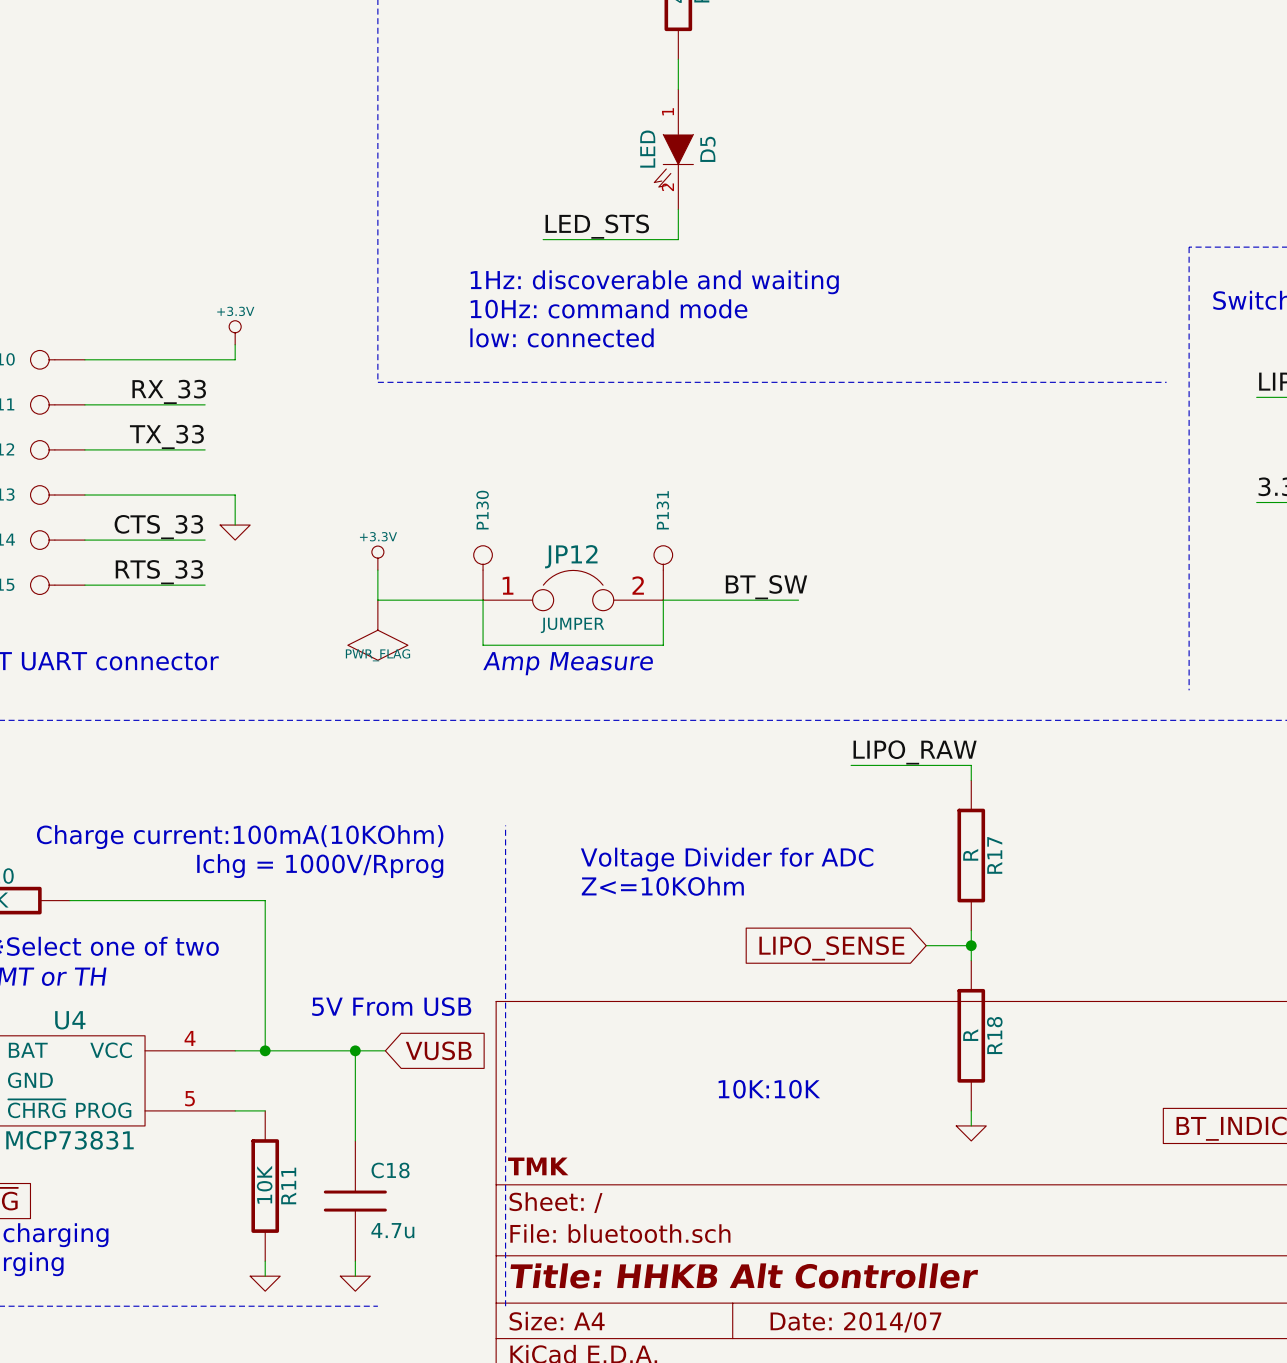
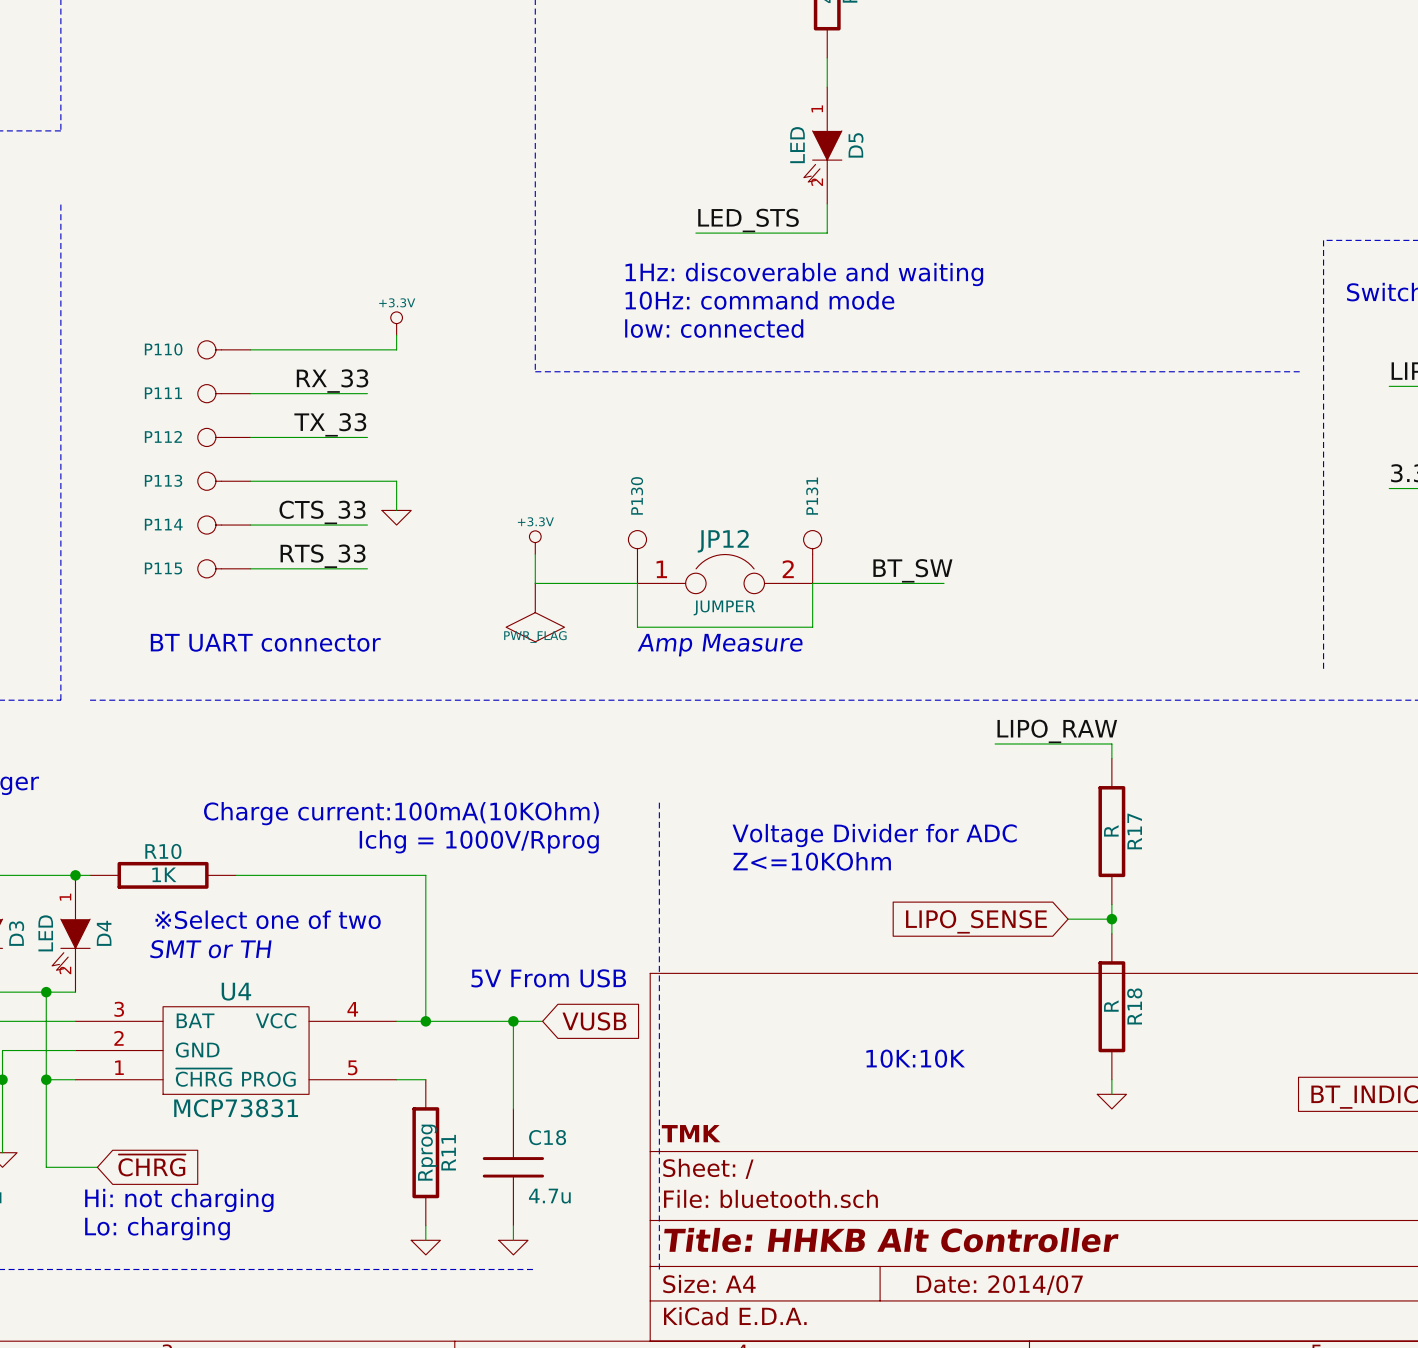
R11 value: 10K (264, 1184) -> Rprog (427, 1152)

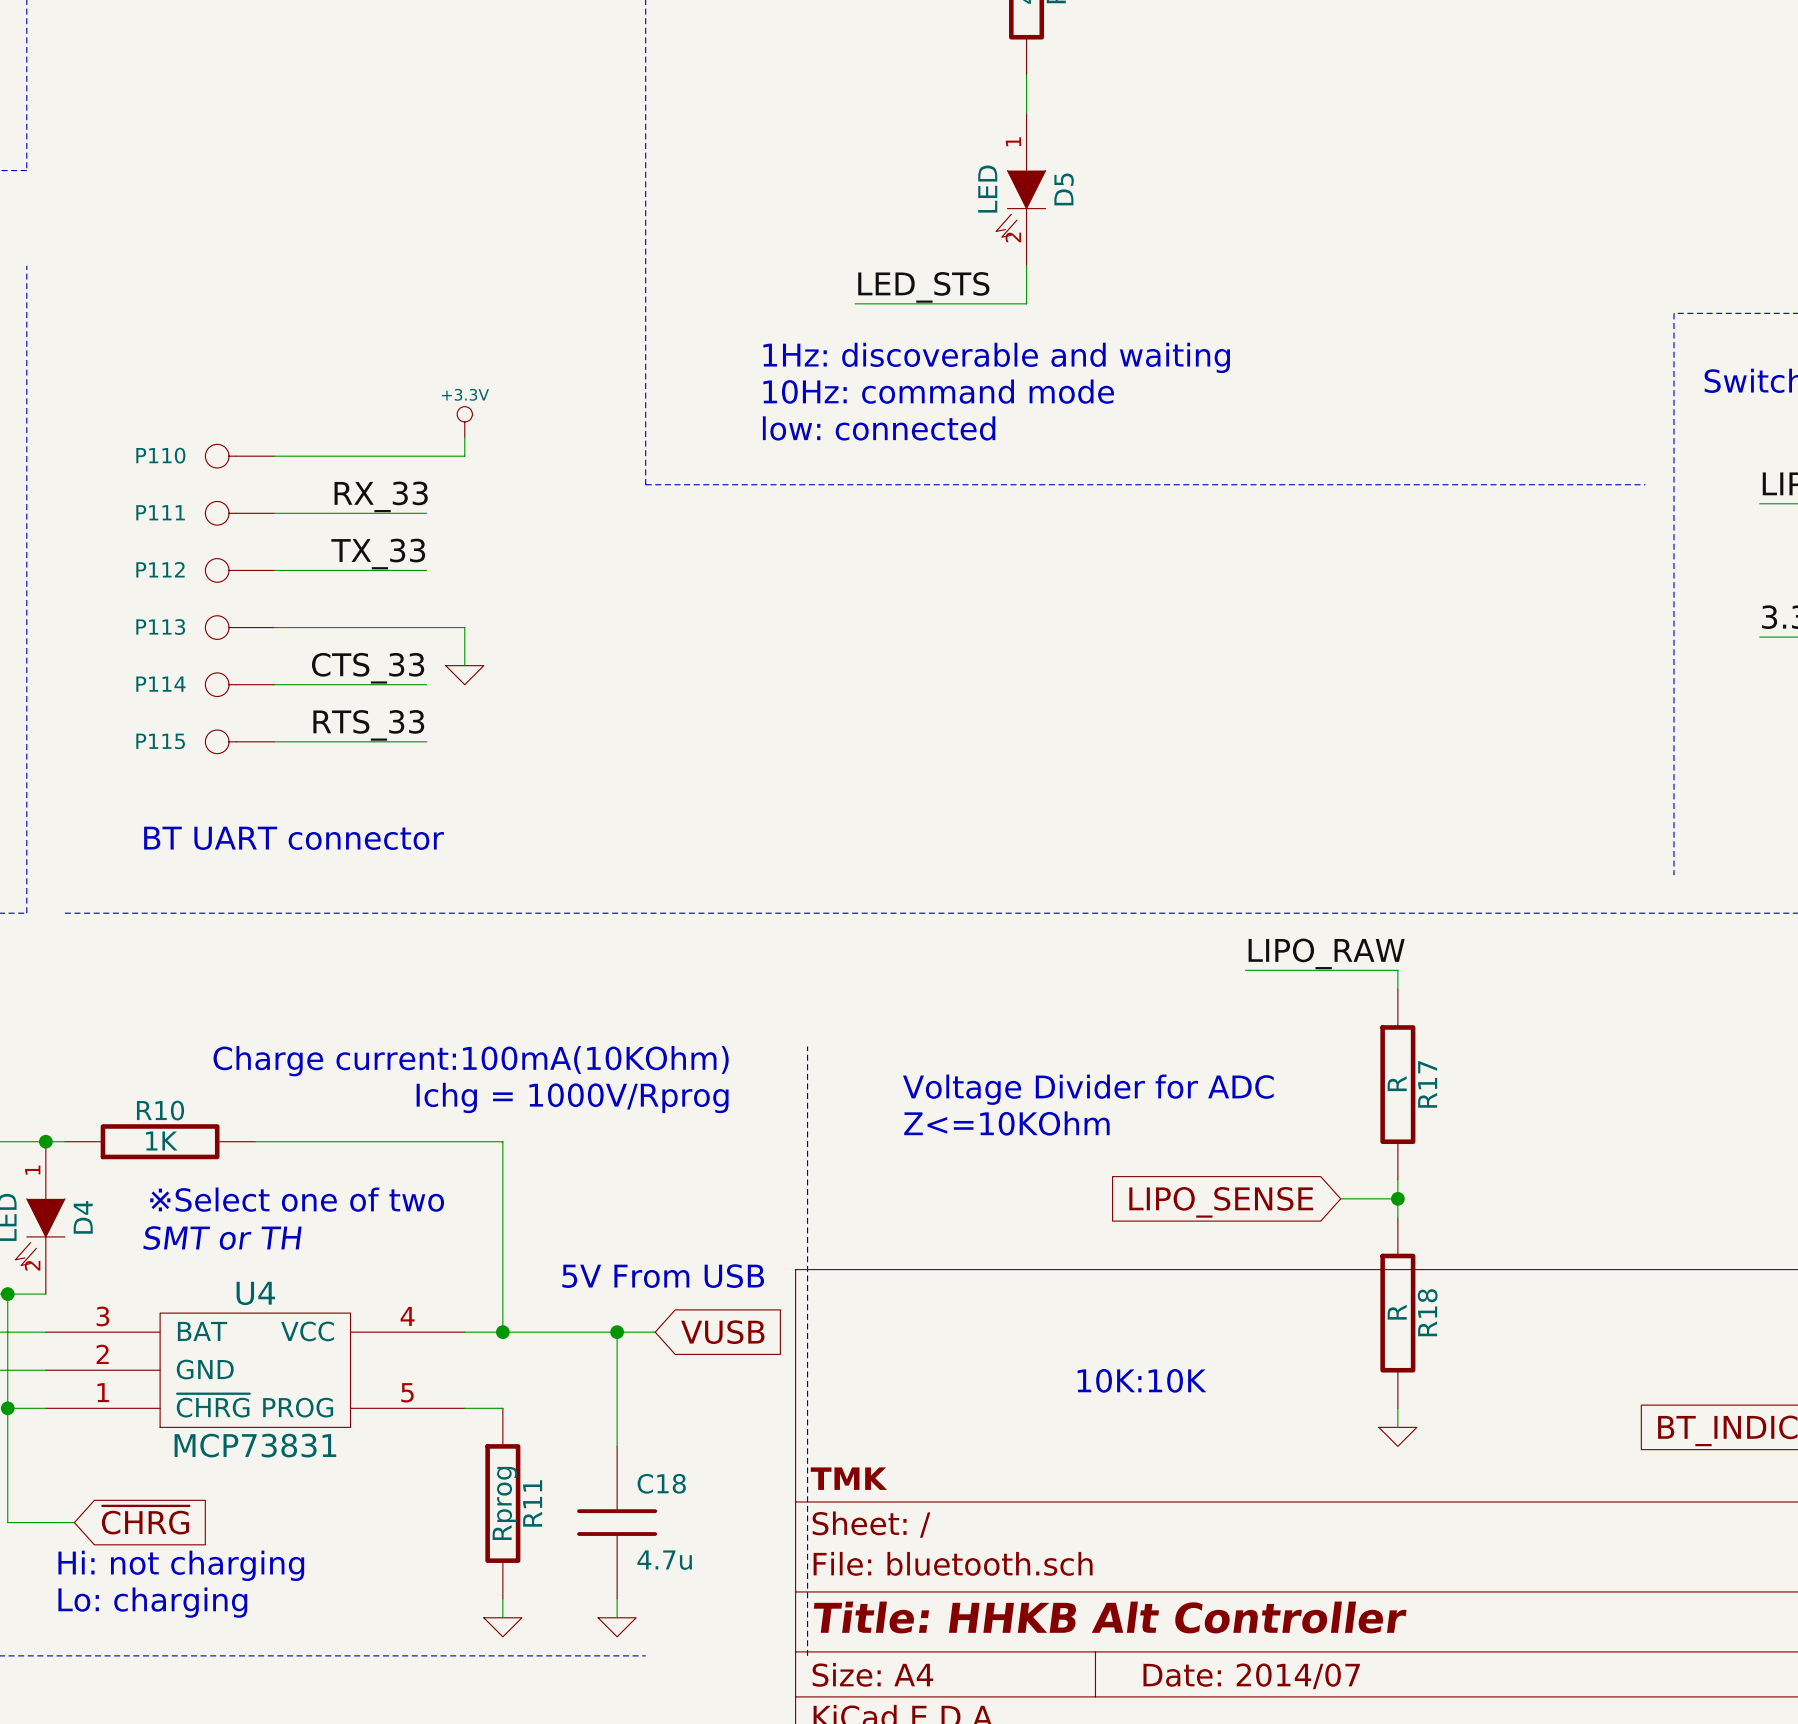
power symbol: +3.3V (535, 542) -> none
wire: (535, 554) (535, 583) (637, 583) (637, 627) (812, 627) (812, 583) (944, 583) -> none
P130: (637, 557) -> none
P131: (812, 557) -> none
label: BT_SW (912, 570) -> none
JP12: JUMPER (725, 574) -> none
power symbol: PWR_FLAG (535, 612) -> none
text: Amp Measure (720, 645) -> none

